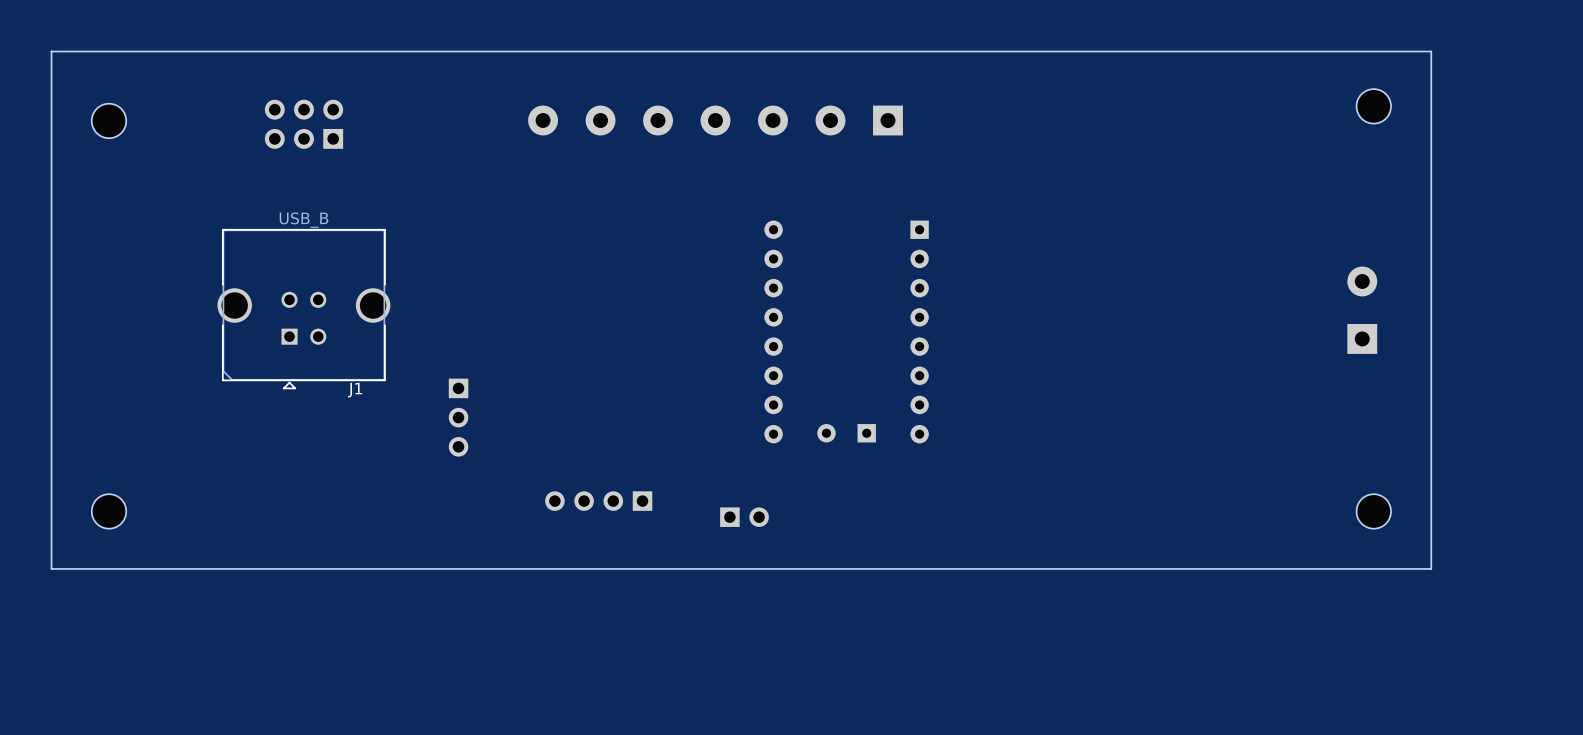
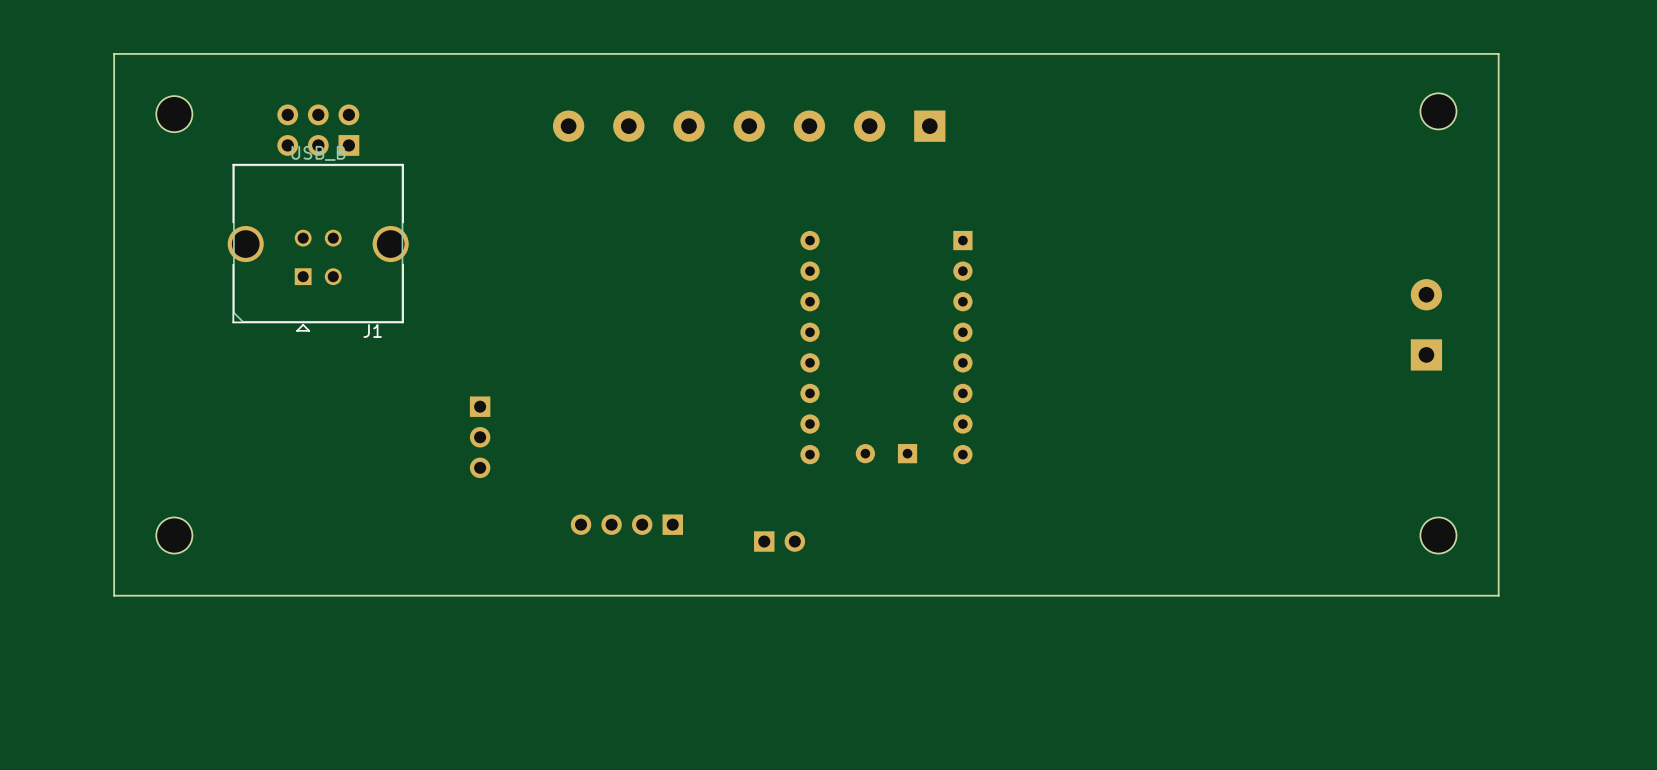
board edge: (109, 51) (51, 51) (51, 568) (109, 568) -> (114, 53) (114, 595)
part position: (109, 120) -> (174, 114)
J1 position: (303, 309) -> (318, 247)
part position: (109, 511) -> (174, 535)

